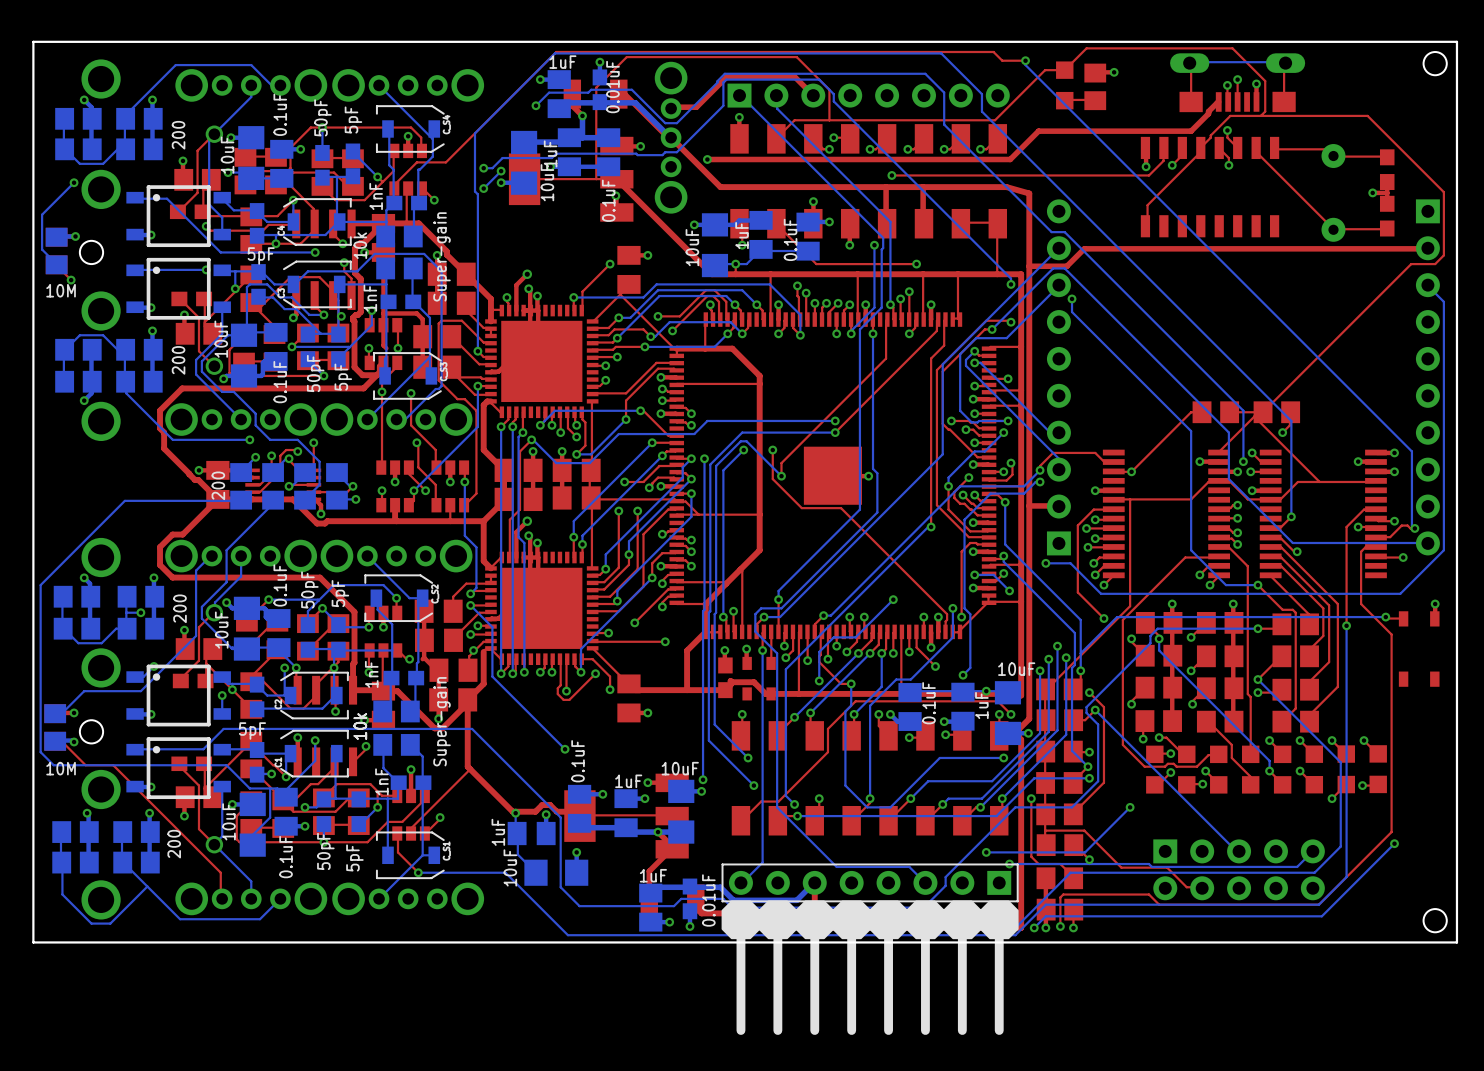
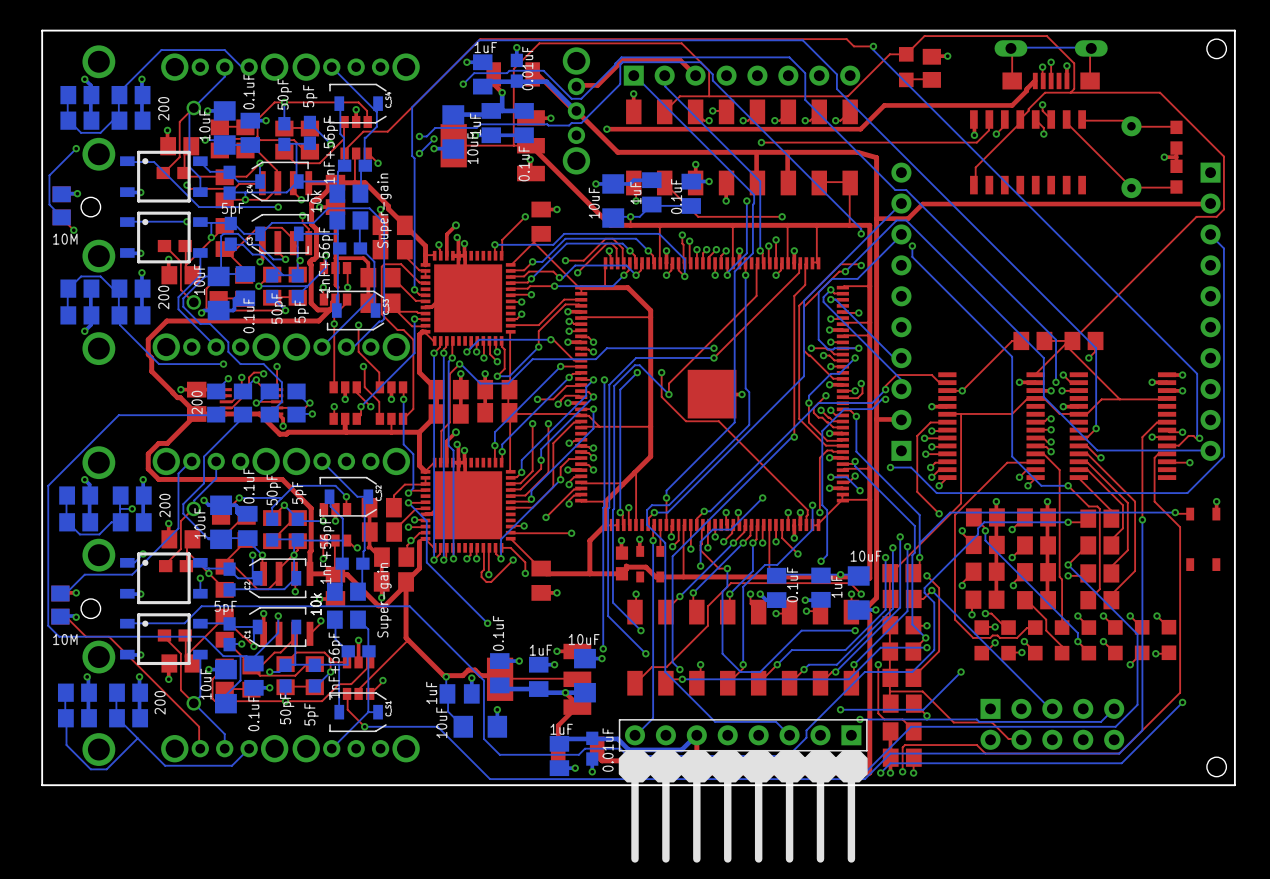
text: 1nF (376, 196) -> 1nF+56pF (330, 150)
text: 1nF (370, 298) -> none
text: none -> 1nF+56pF (326, 260)
text: 1nF (371, 674) -> 1nF+56pF (327, 550)
text: 1nF (381, 781) -> none
text: none -> 1nF+56pF (335, 665)

